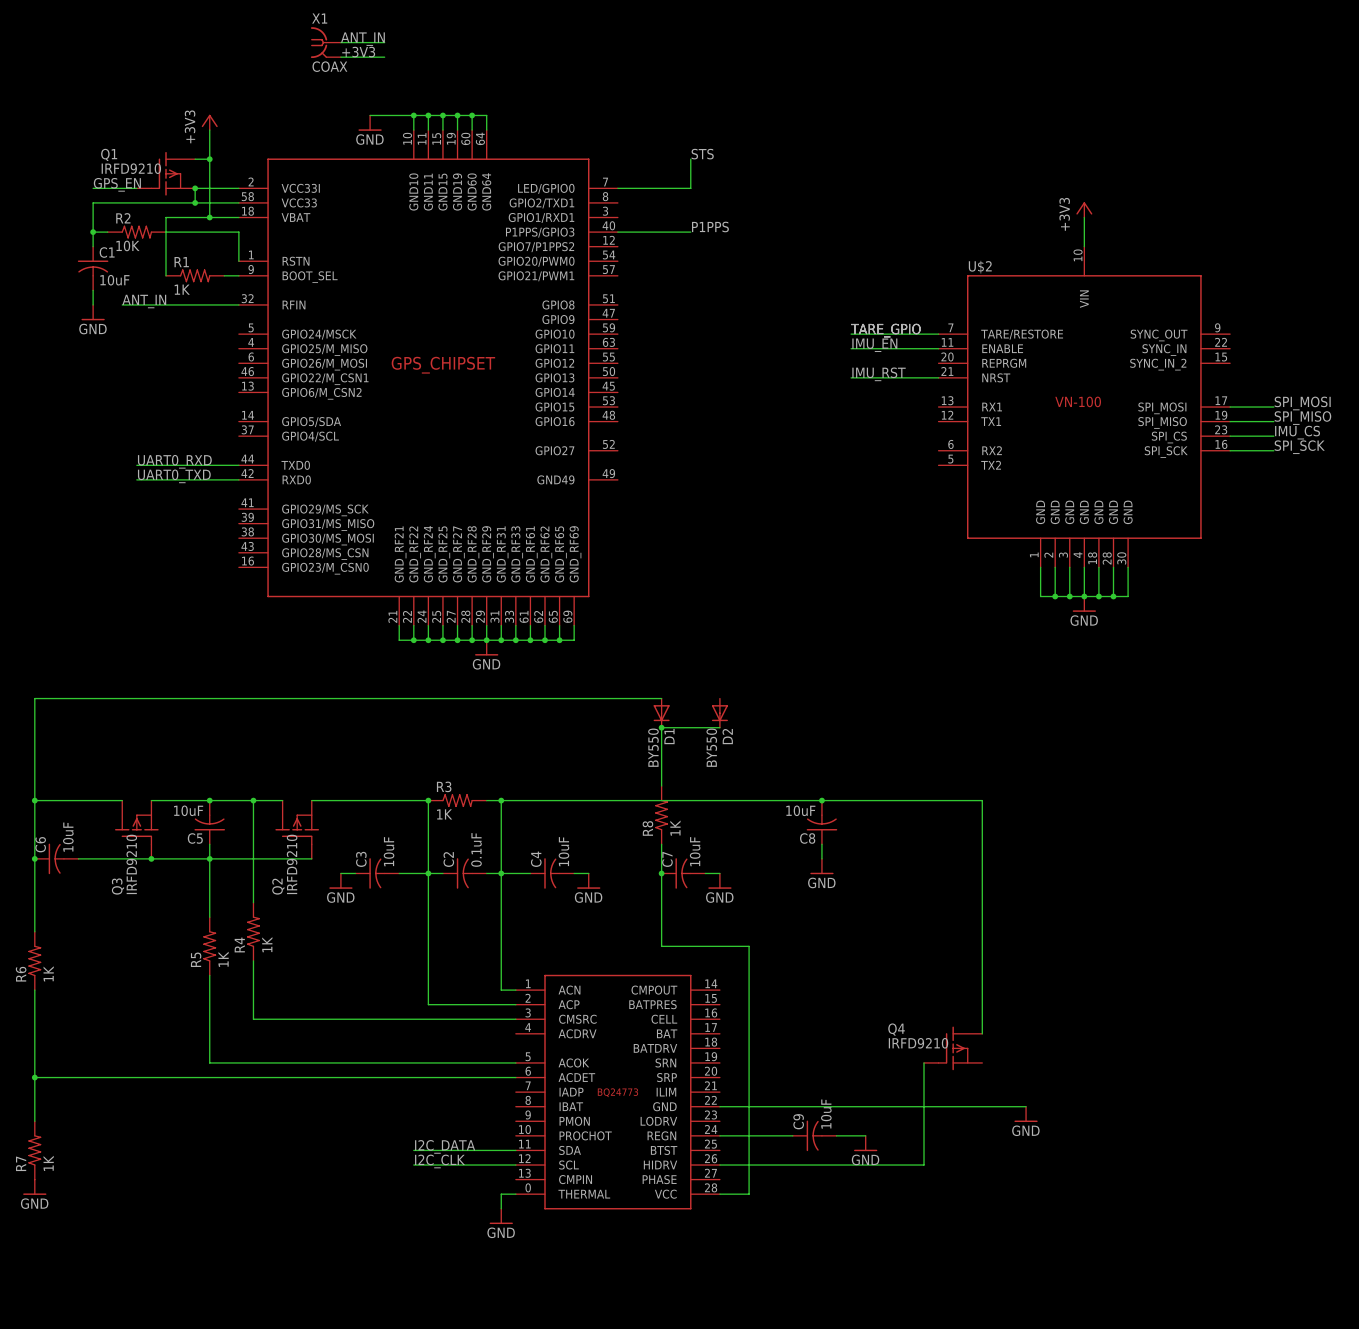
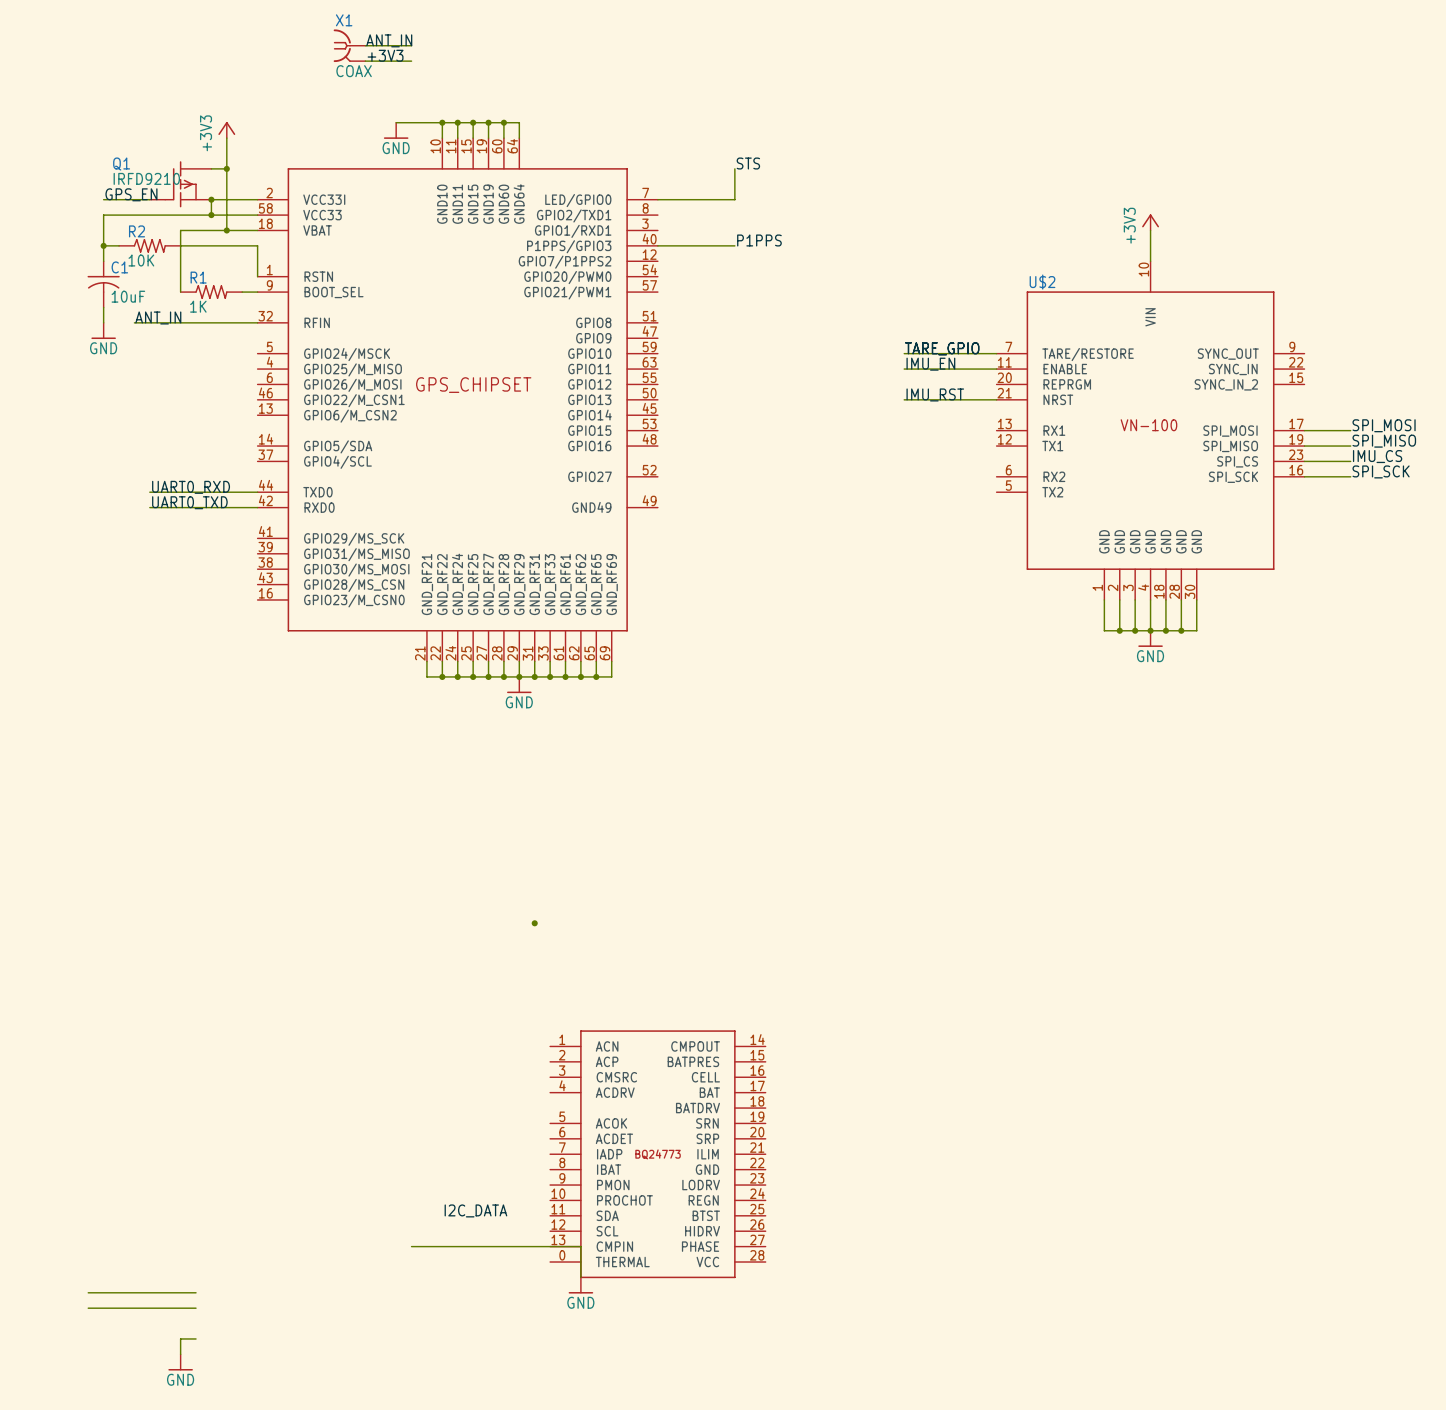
wire: (661, 698) (34, 698) (34, 931) -> none
D1: BY550 (661, 713) -> none
D2: BY550 (719, 713) -> none
junction: (661, 727) -> none
wire: (719, 727) (661, 727) (661, 786) -> none
wire: (34, 800) (122, 800) -> none
junction: (34, 800) -> none
wire: (151, 800) (282, 800) -> none
junction: (209, 800) -> none
wire: (253, 800) (253, 902) -> none
junction: (253, 800) -> none
wire: (311, 800) (428, 800) (428, 1004) (515, 1004) -> none
junction: (428, 800) -> none
R3: 1K (457, 800) -> none
wire: (486, 800) (982, 800) (982, 1033) -> none
wire: (501, 800) (501, 990) (515, 990) -> none
junction: (501, 800) -> none
junction: (821, 800) -> none
R8: 1K (661, 815) -> none
C5: 10uF (209, 822) -> none
C8: 10uF (821, 822) -> none
Q3: IRFD9210 (136, 829) -> none
Q2: IRFD9210 (297, 829) -> none
wire: (209, 844) (209, 917) -> none
wire: (661, 844) (661, 946) (749, 946) (749, 1194) (719, 1194) -> none
wire: (821, 844) (821, 858) -> none
junction: (34, 858) -> none
C6: 10uF (56, 858) -> none
wire: (78, 858) (311, 858) -> none
junction: (151, 858) -> none
junction: (209, 858) -> none
power symbol: GND (821, 866) -> none
wire: (340, 873) (355, 873) -> none
C3: 10uF (377, 873) -> none
wire: (399, 873) (442, 873) -> none
junction: (428, 873) -> none
C2: 0.1uF (464, 873) -> none
wire: (486, 873) (530, 873) -> none
C4: 10uF (552, 873) -> none
wire: (574, 873) (588, 873) -> none
junction: (661, 873) -> none
C7: 10uF (683, 873) -> none
wire: (705, 873) (719, 873) -> none
power symbol: GND (340, 881) -> none
power symbol: GND (588, 881) -> none
power symbol: GND (719, 881) -> none
R4: 1K (253, 931) -> none
R5: 1K (209, 946) -> none
R6: 1K (34, 960) -> none
wire: (253, 960) (253, 1019) (515, 1019) -> none
wire: (209, 975) (209, 1062) (515, 1062) -> none
wire: (34, 990) (34, 1121) -> none
Q4: IRFD9210 (953, 1048) -> none
wire: (924, 1062) (924, 1165) (719, 1165) -> none
wire: (34, 1077) (515, 1077) -> none
junction: (34, 1077) -> none
wire: (719, 1106) (1026, 1106) -> none
power symbol: GND (1026, 1114) -> none
wire: (719, 1135) (792, 1135) -> none
C9: 10uF (814, 1135) -> none
wire: (836, 1135) (865, 1135) -> none
power symbol: GND (865, 1143) -> none
R7: 1K (34, 1150) -> none
wire: (413, 1150) (515, 1150) -> none
label: I2C_CLK (440, 1161) -> none
wire: (413, 1165) (515, 1165) -> none
wire: none -> (411, 1246) (580, 1246) (580, 1277)
power symbol: GND (34, 1187) -> none
wire: (515, 1194) (501, 1194) (501, 1208) -> none
power symbol position: GND (501, 1216) -> GND (580, 1285)
wire: none -> (88, 1292) (196, 1292)
wire: none -> (88, 1308) (196, 1308)
wire: none -> (196, 1338) (180, 1338) (180, 1354)
power symbol: none -> GND (180, 1362)

